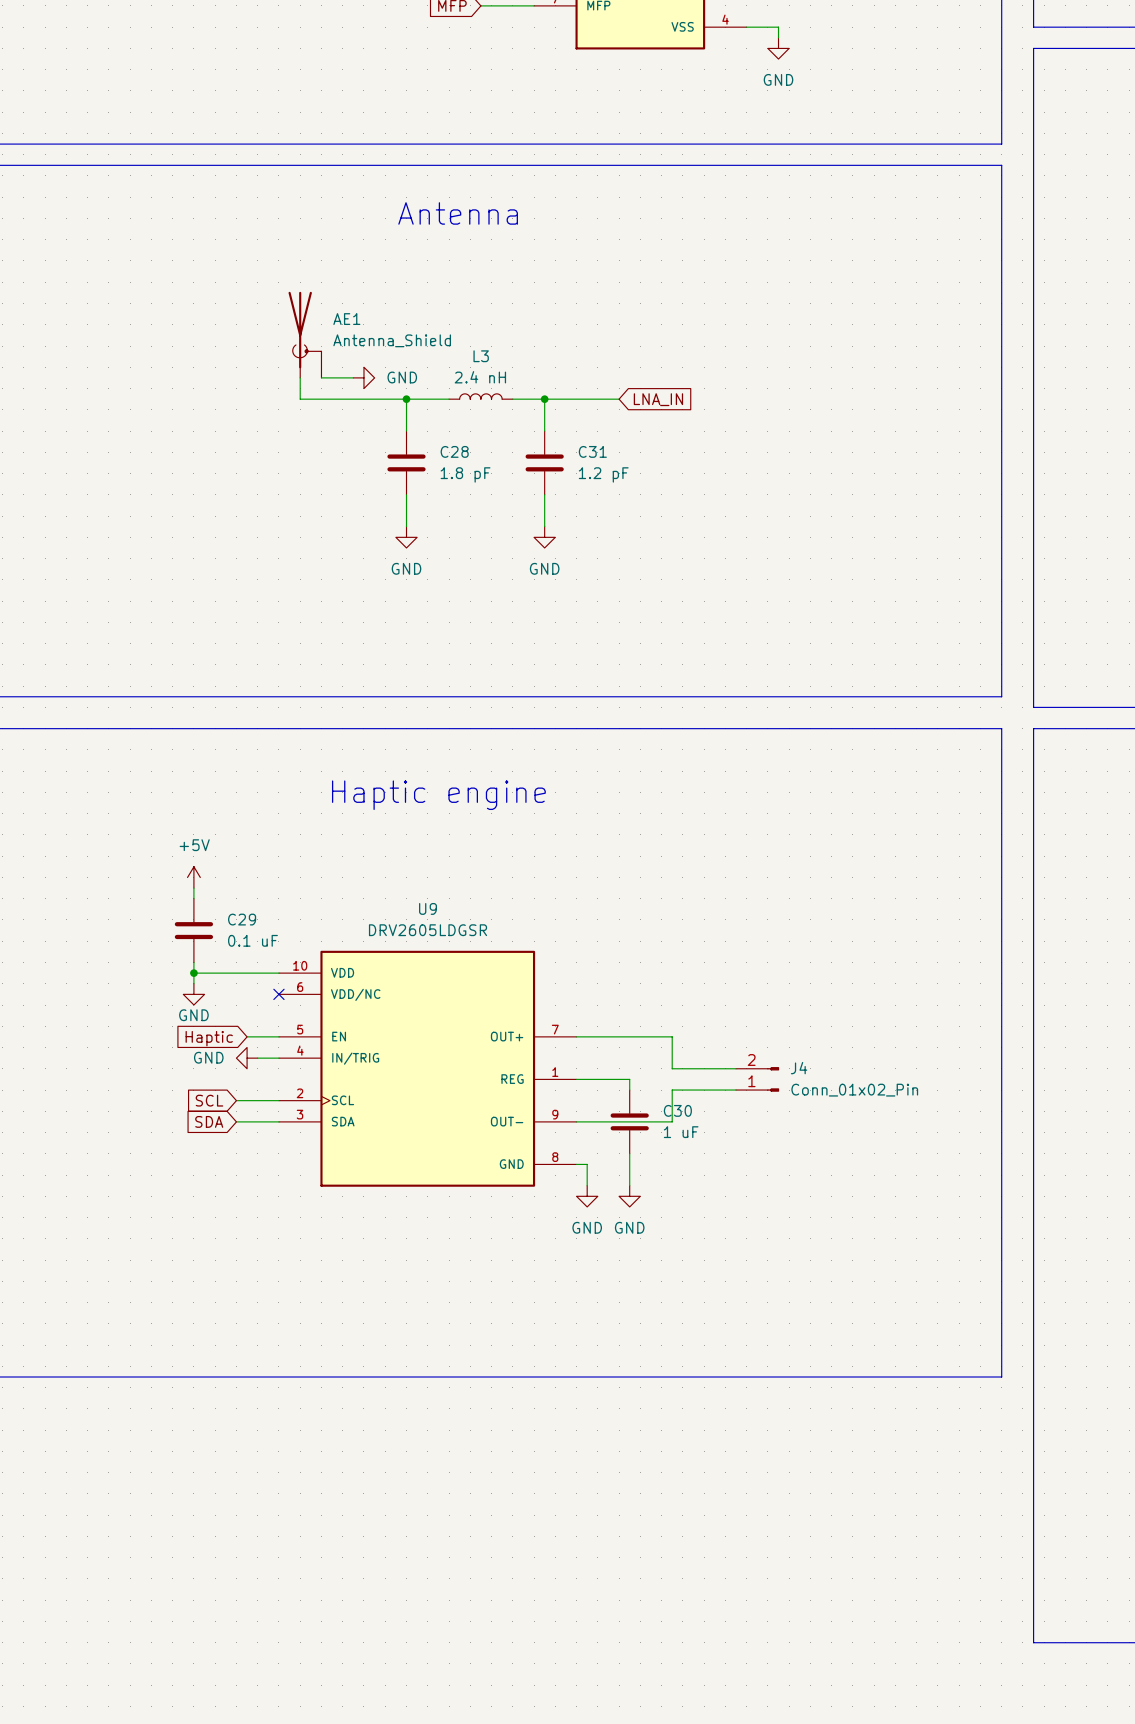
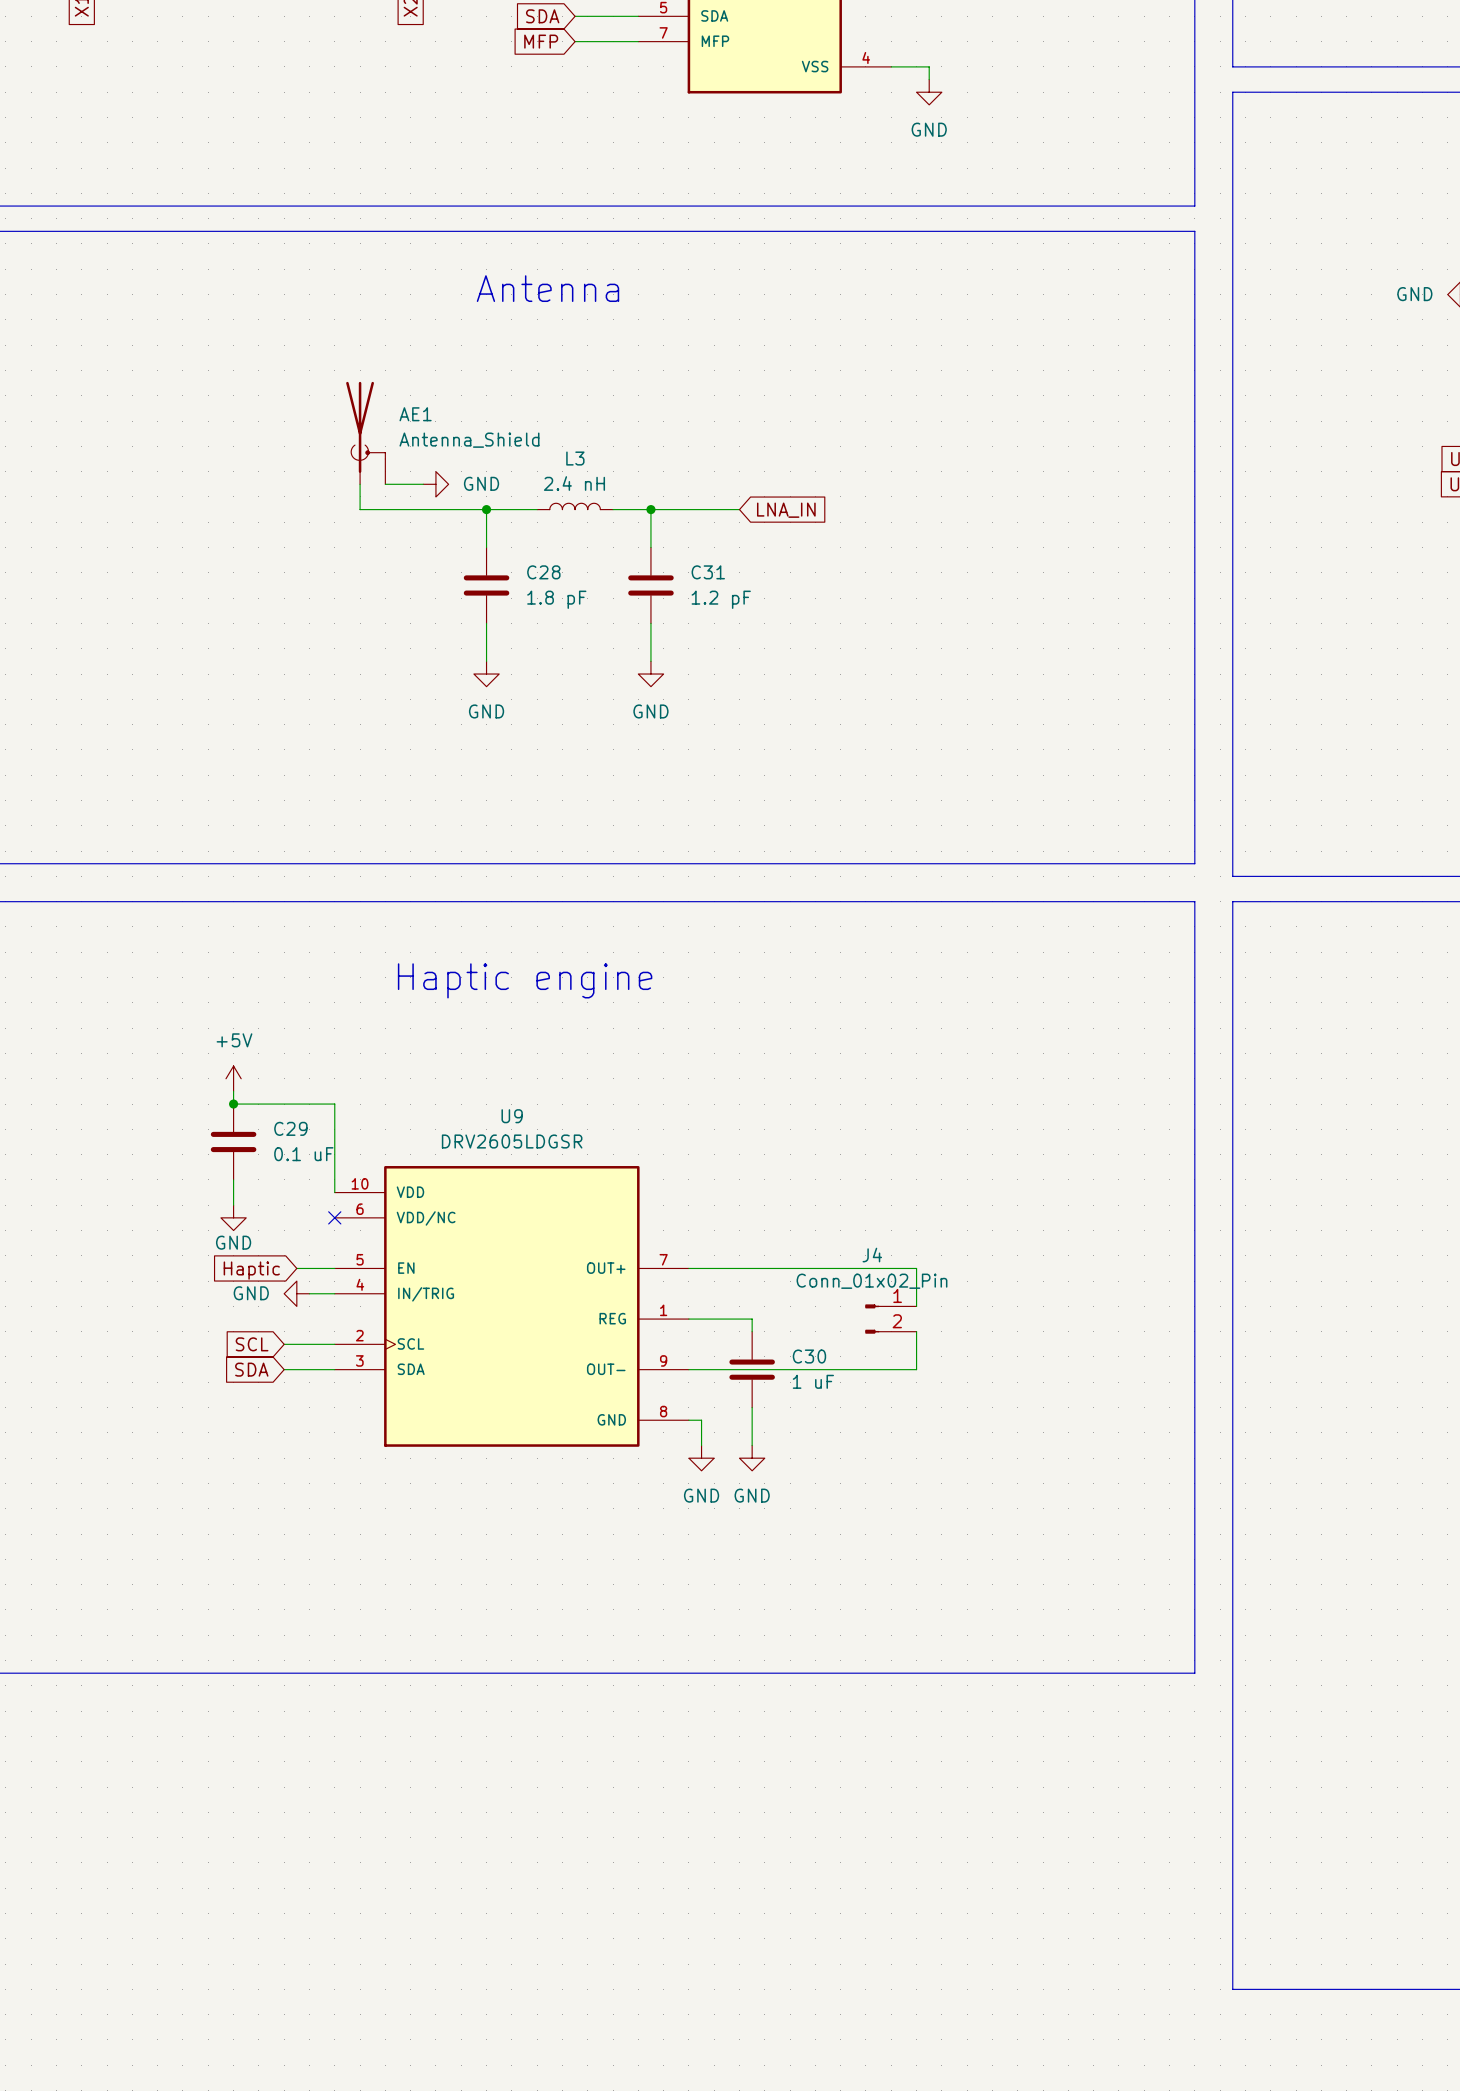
junction: none -> (233, 1104)
wire: (193, 973) (278, 973) -> (233, 1104) (334, 1104) (334, 1192)
junction: (193, 973) -> none
wire: (672, 1036) (672, 1068) (735, 1068) -> (802, 1268) (916, 1268) (916, 1306)
J4 name position: J4 (799, 1068) -> J4 (872, 1255)
J4 rotation: 0° (773, 1079) -> 180° (872, 1319)
wire: (735, 1090) (672, 1090) (672, 1121) -> (916, 1331) (916, 1369) (802, 1369)
J4 value position: Conn_01x02_Pin (854, 1090) -> Conn_01x02_Pin (872, 1281)

